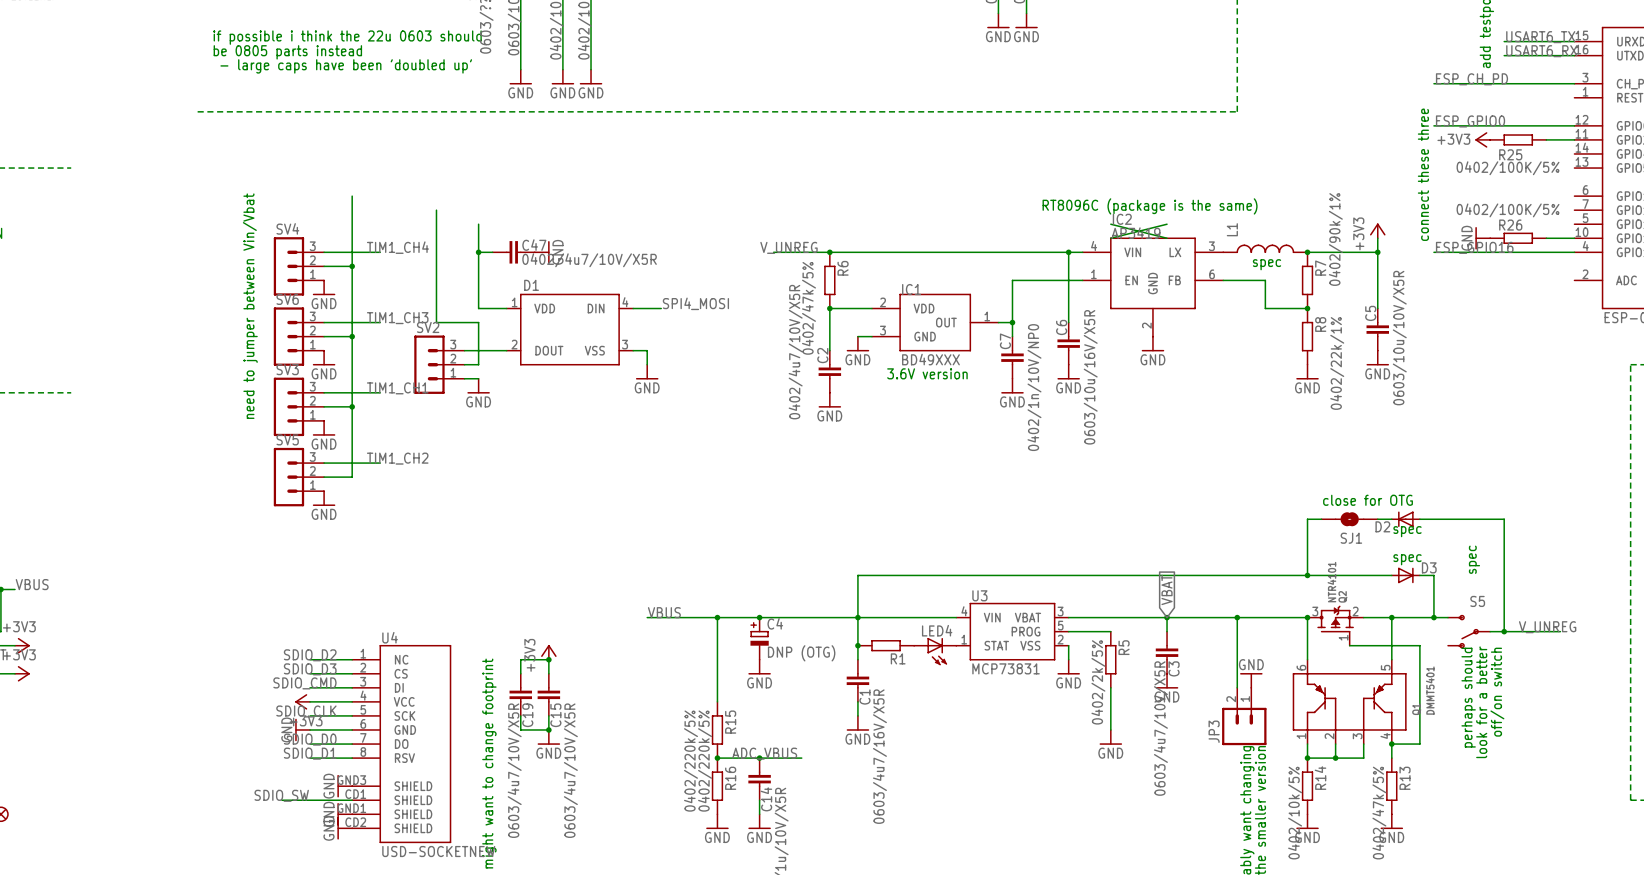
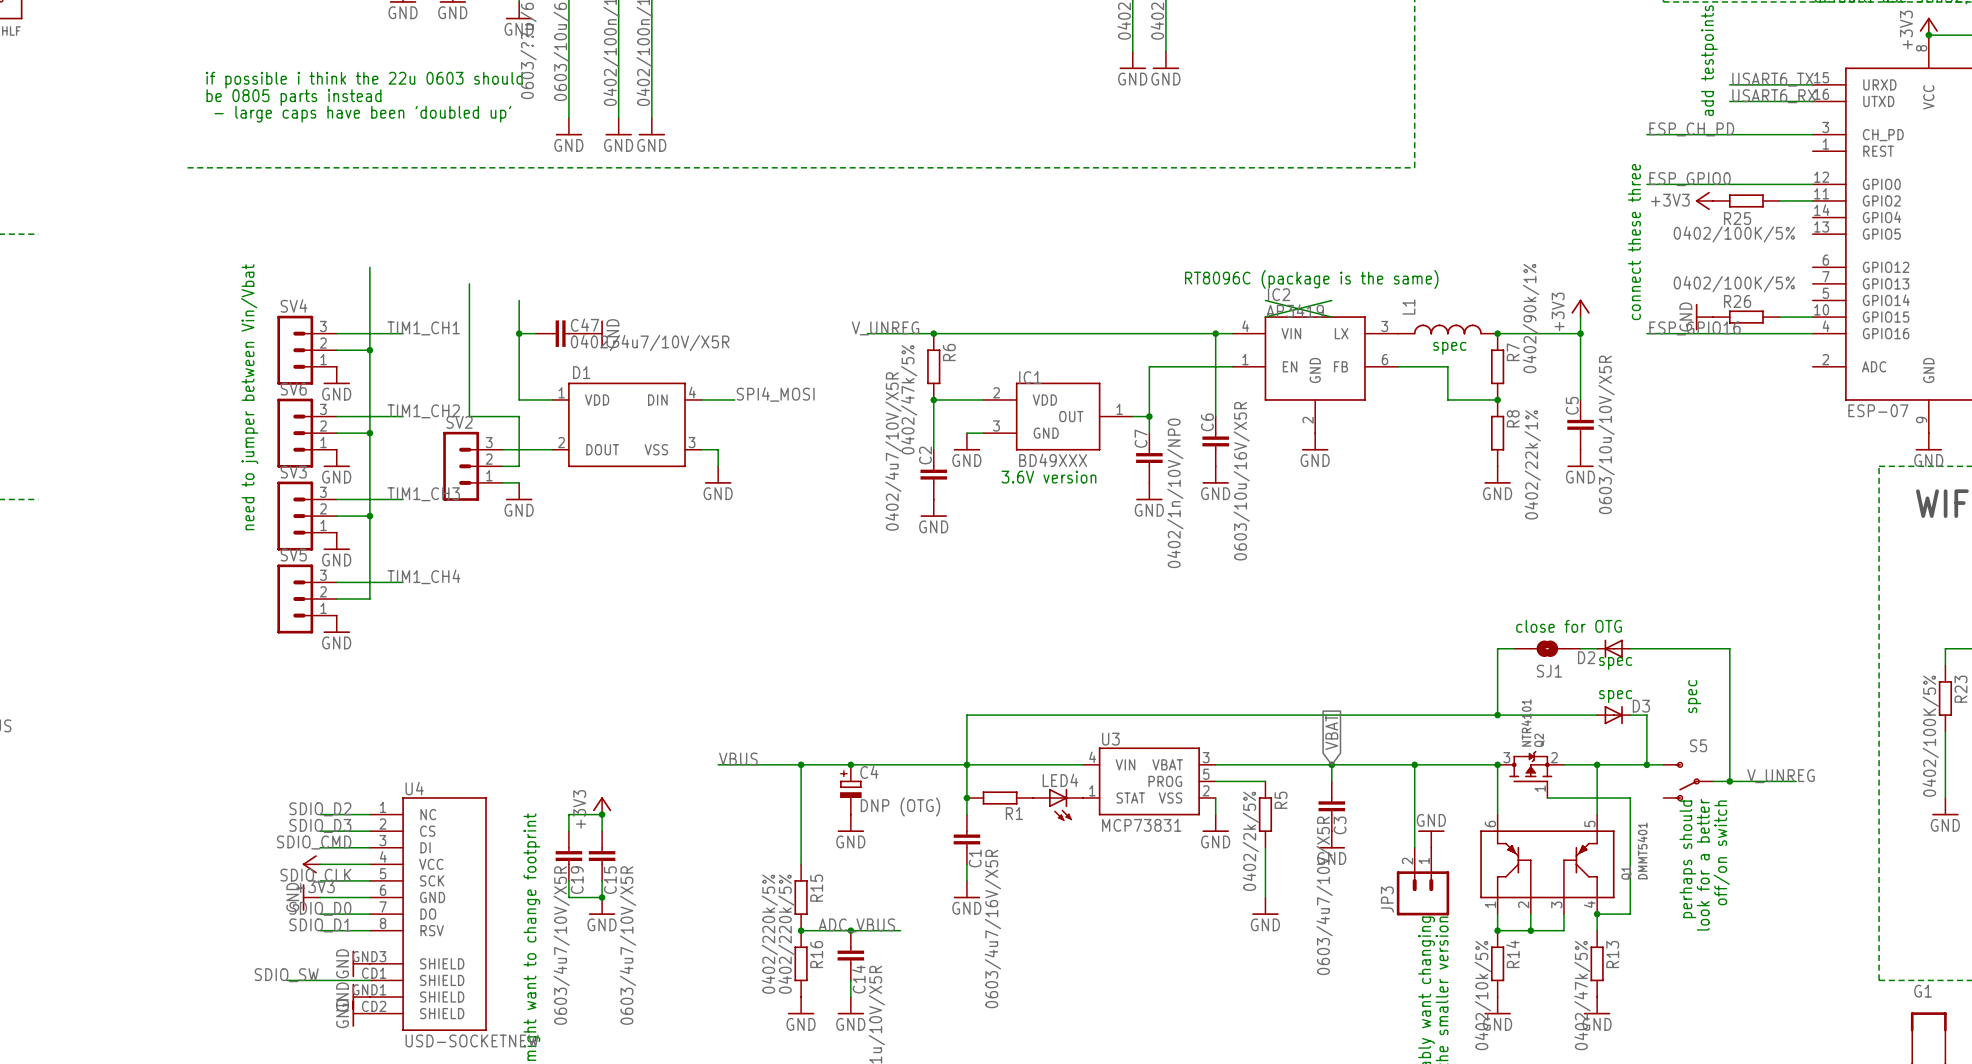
label: TIM1_CH4 (397, 247) -> TIM1_CH1 (423, 328)
label: TIM1_CH3 (397, 318) -> TIM1_CH2 (423, 411)
label: TIM1_CH1 (397, 388) -> TIM1_CH3 (423, 494)
label: TIM1_CH2 (397, 458) -> TIM1_CH4 (423, 576)

